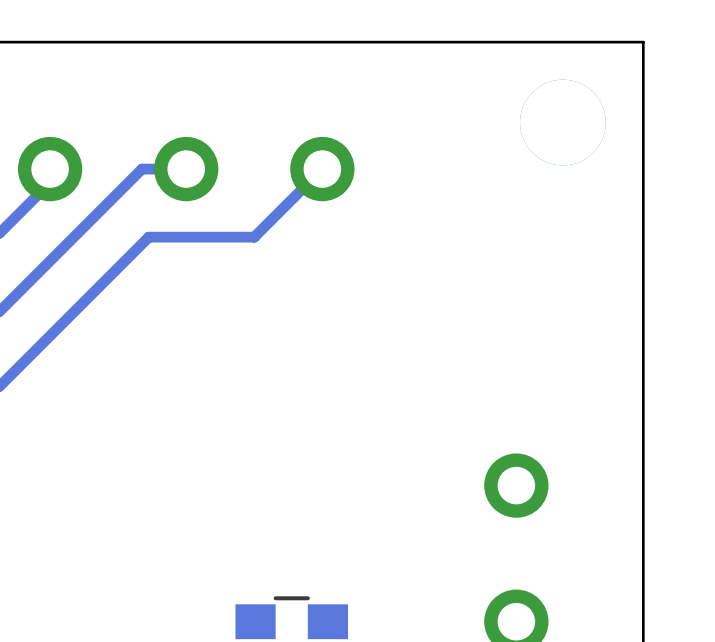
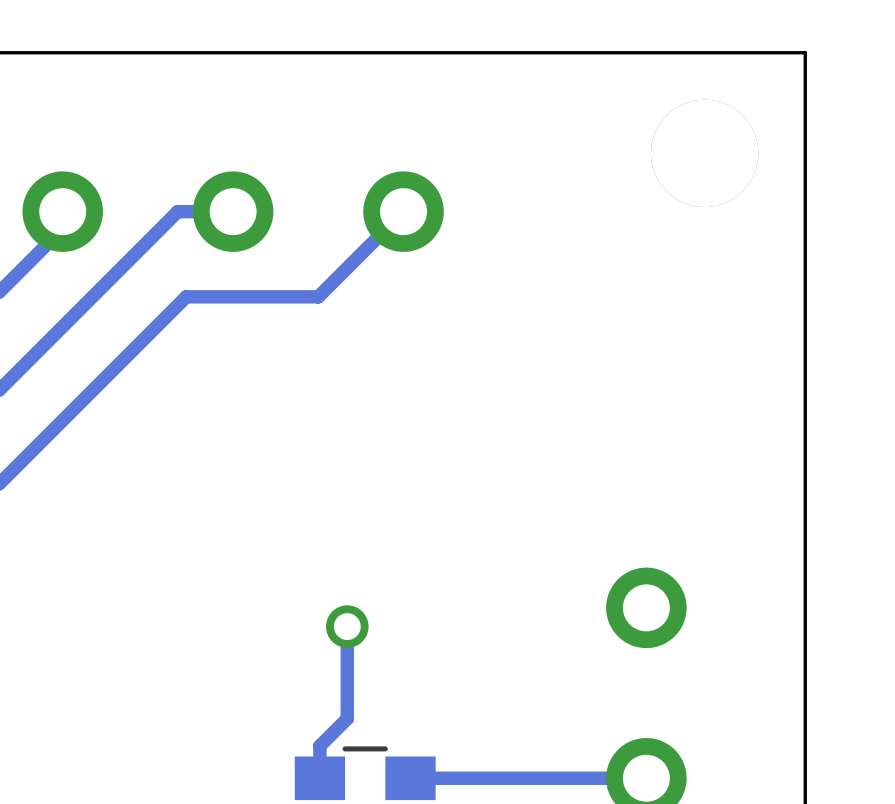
track: none -> (347, 626) (347, 718) (319, 746) (319, 778)
via: none -> (347, 626)
track: none -> (646, 778) (410, 778)

